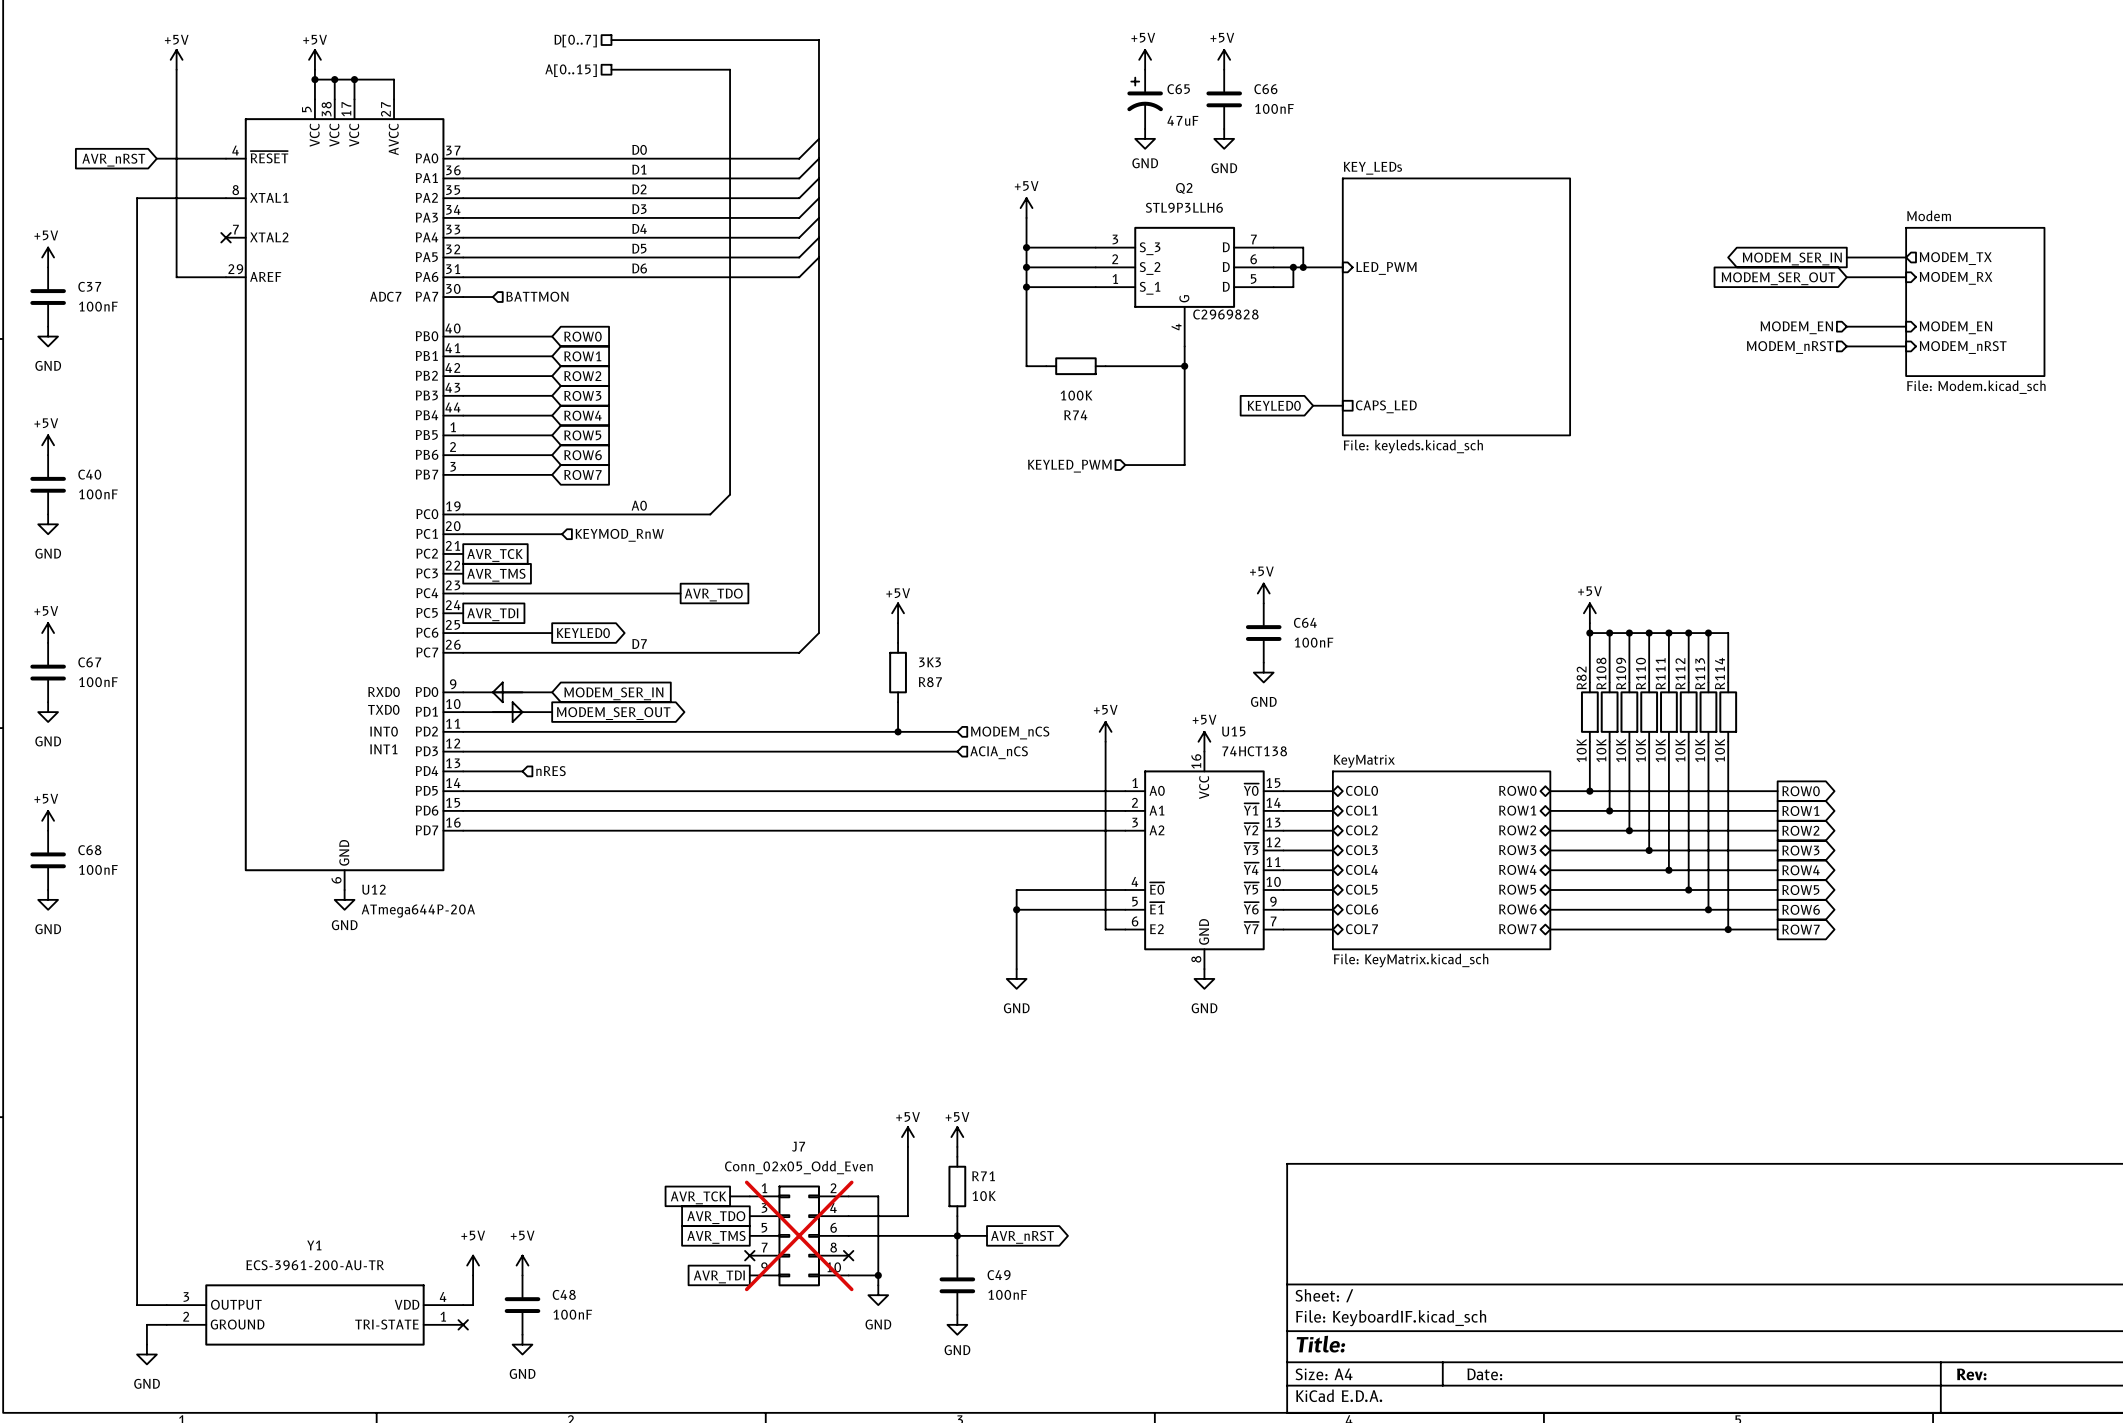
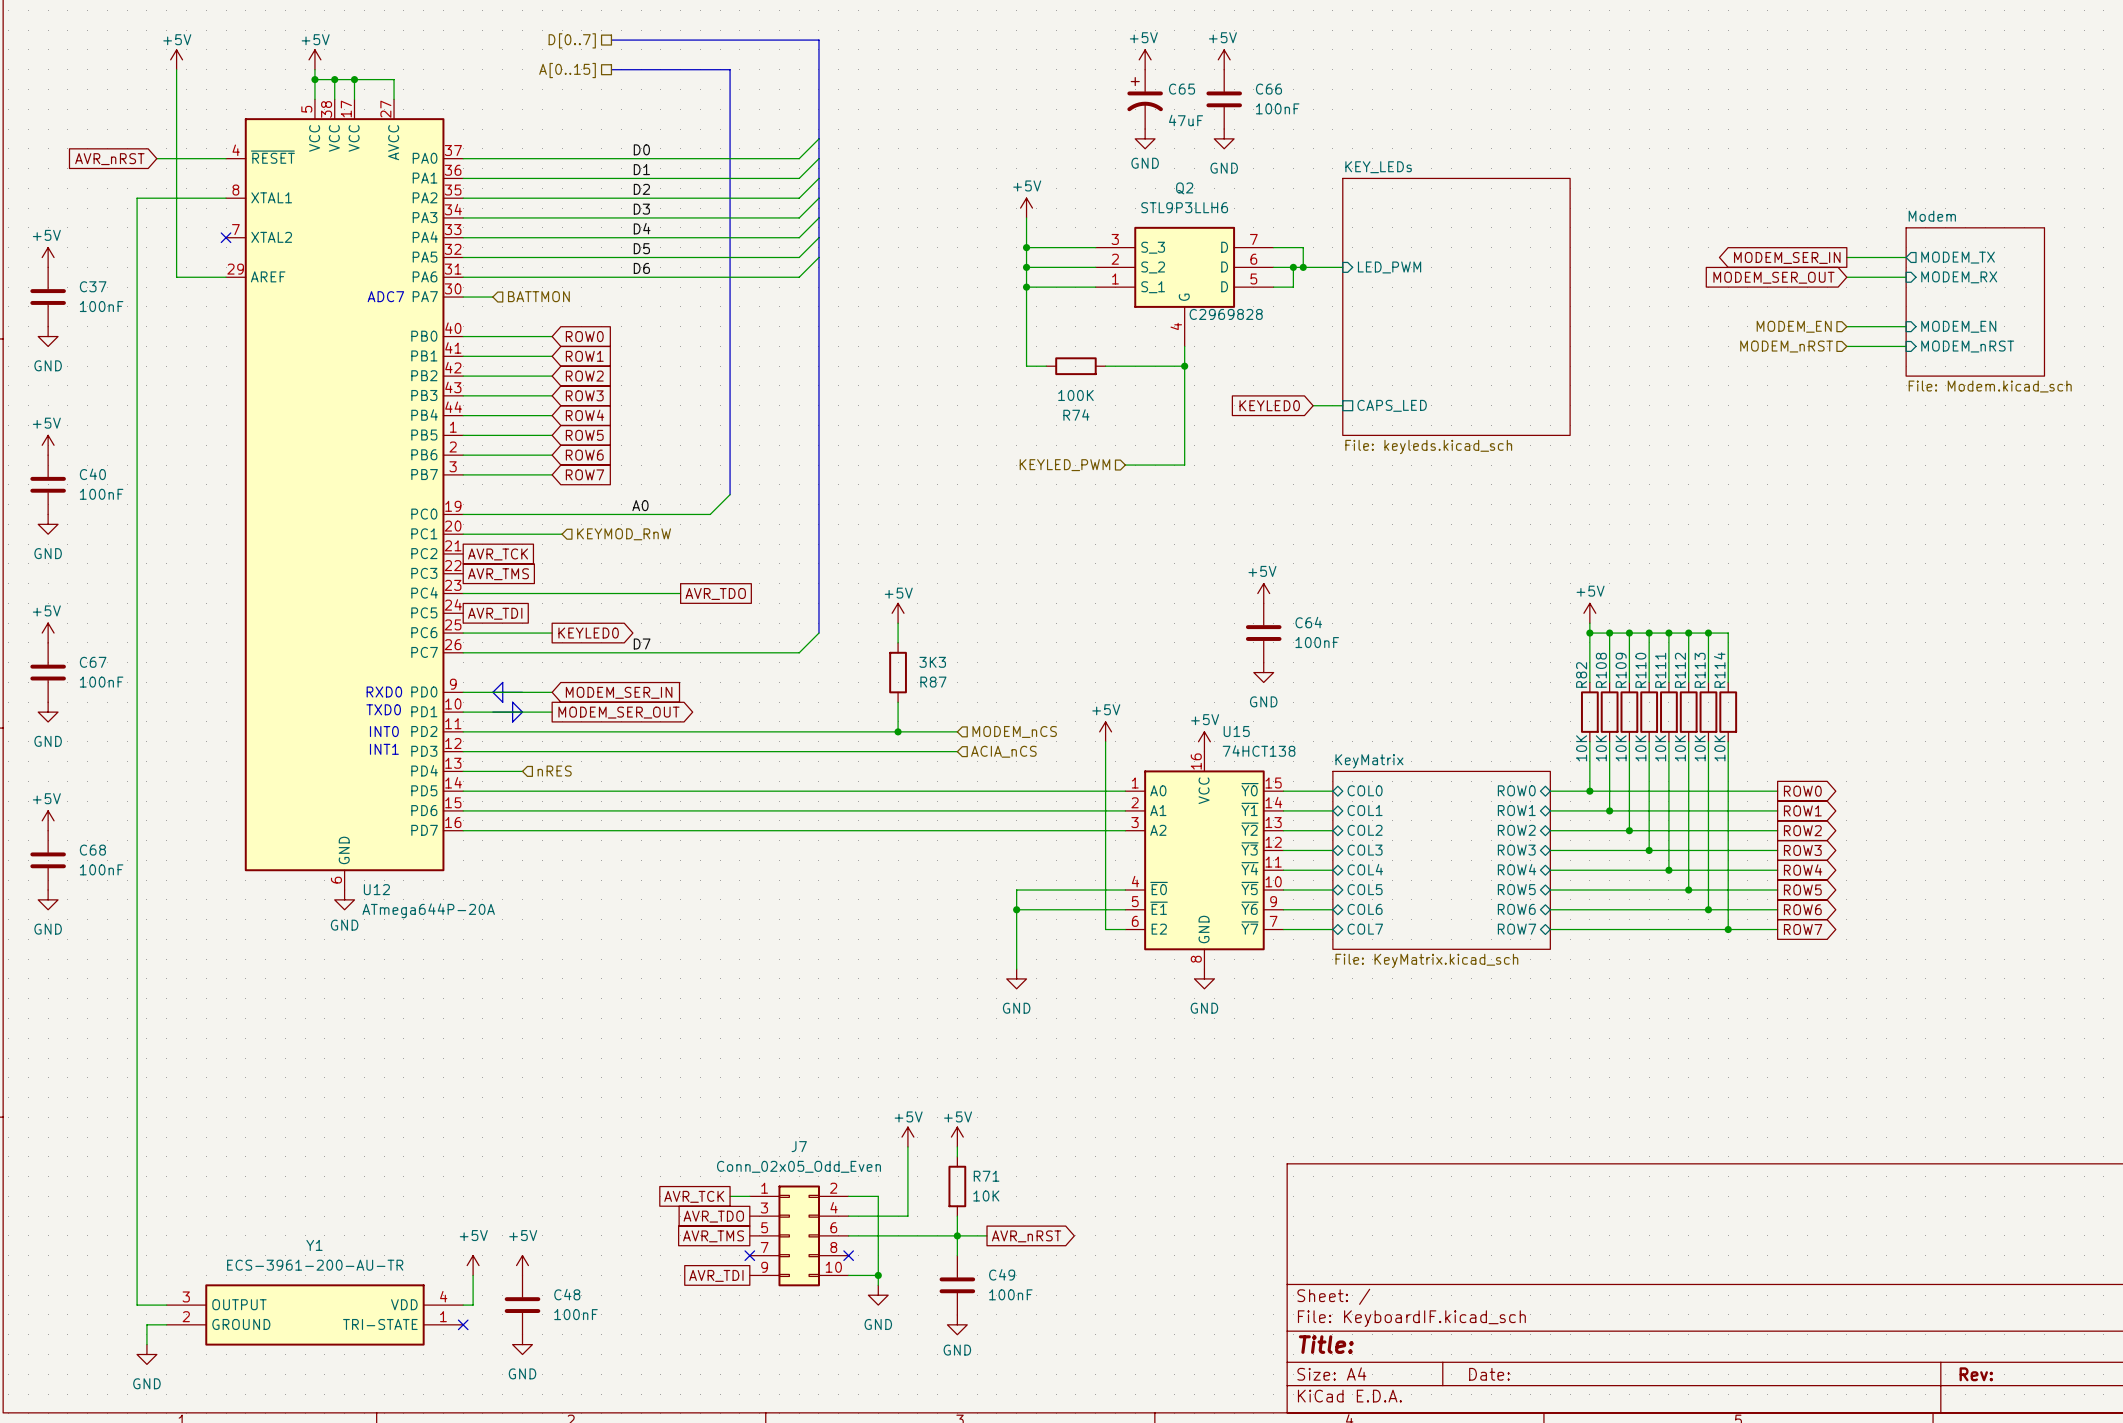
J7 do-not-place cross: (799, 1235) -> none

